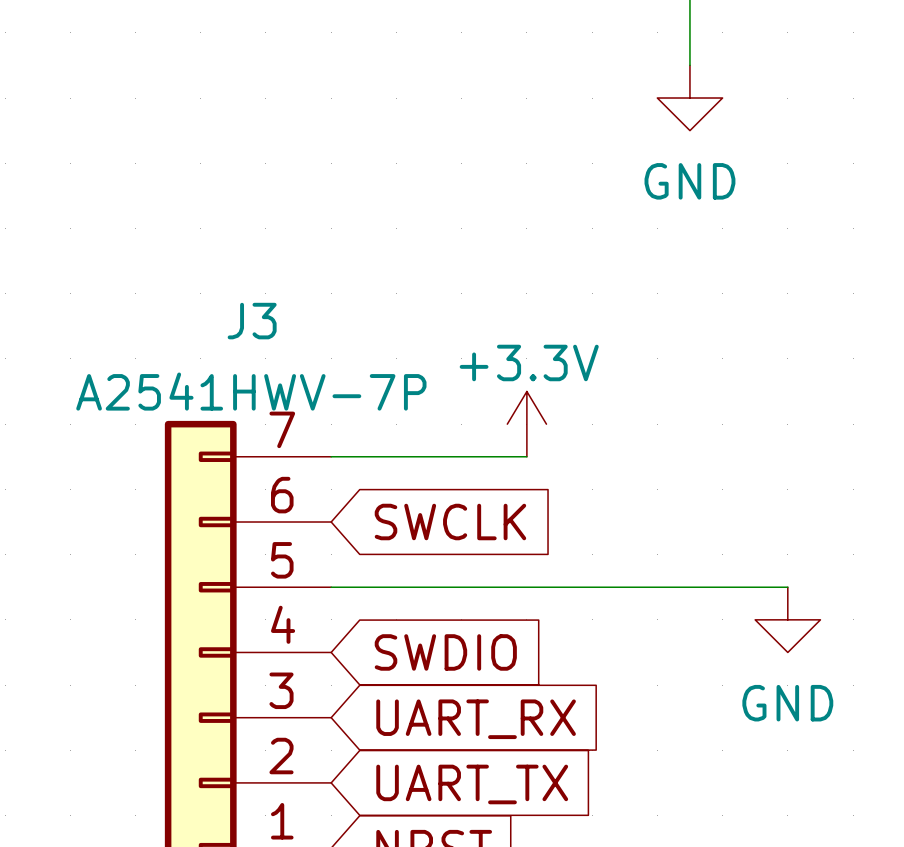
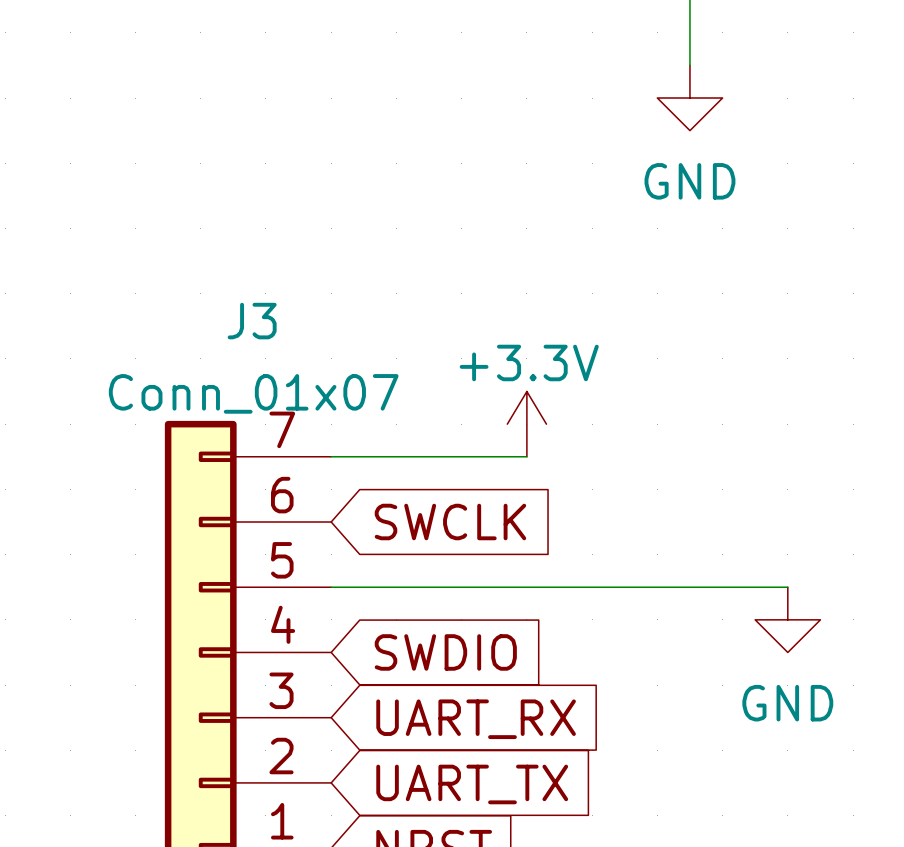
J3 value: A2541HWV-7P (251, 391) -> Conn_01x07 (253, 393)

